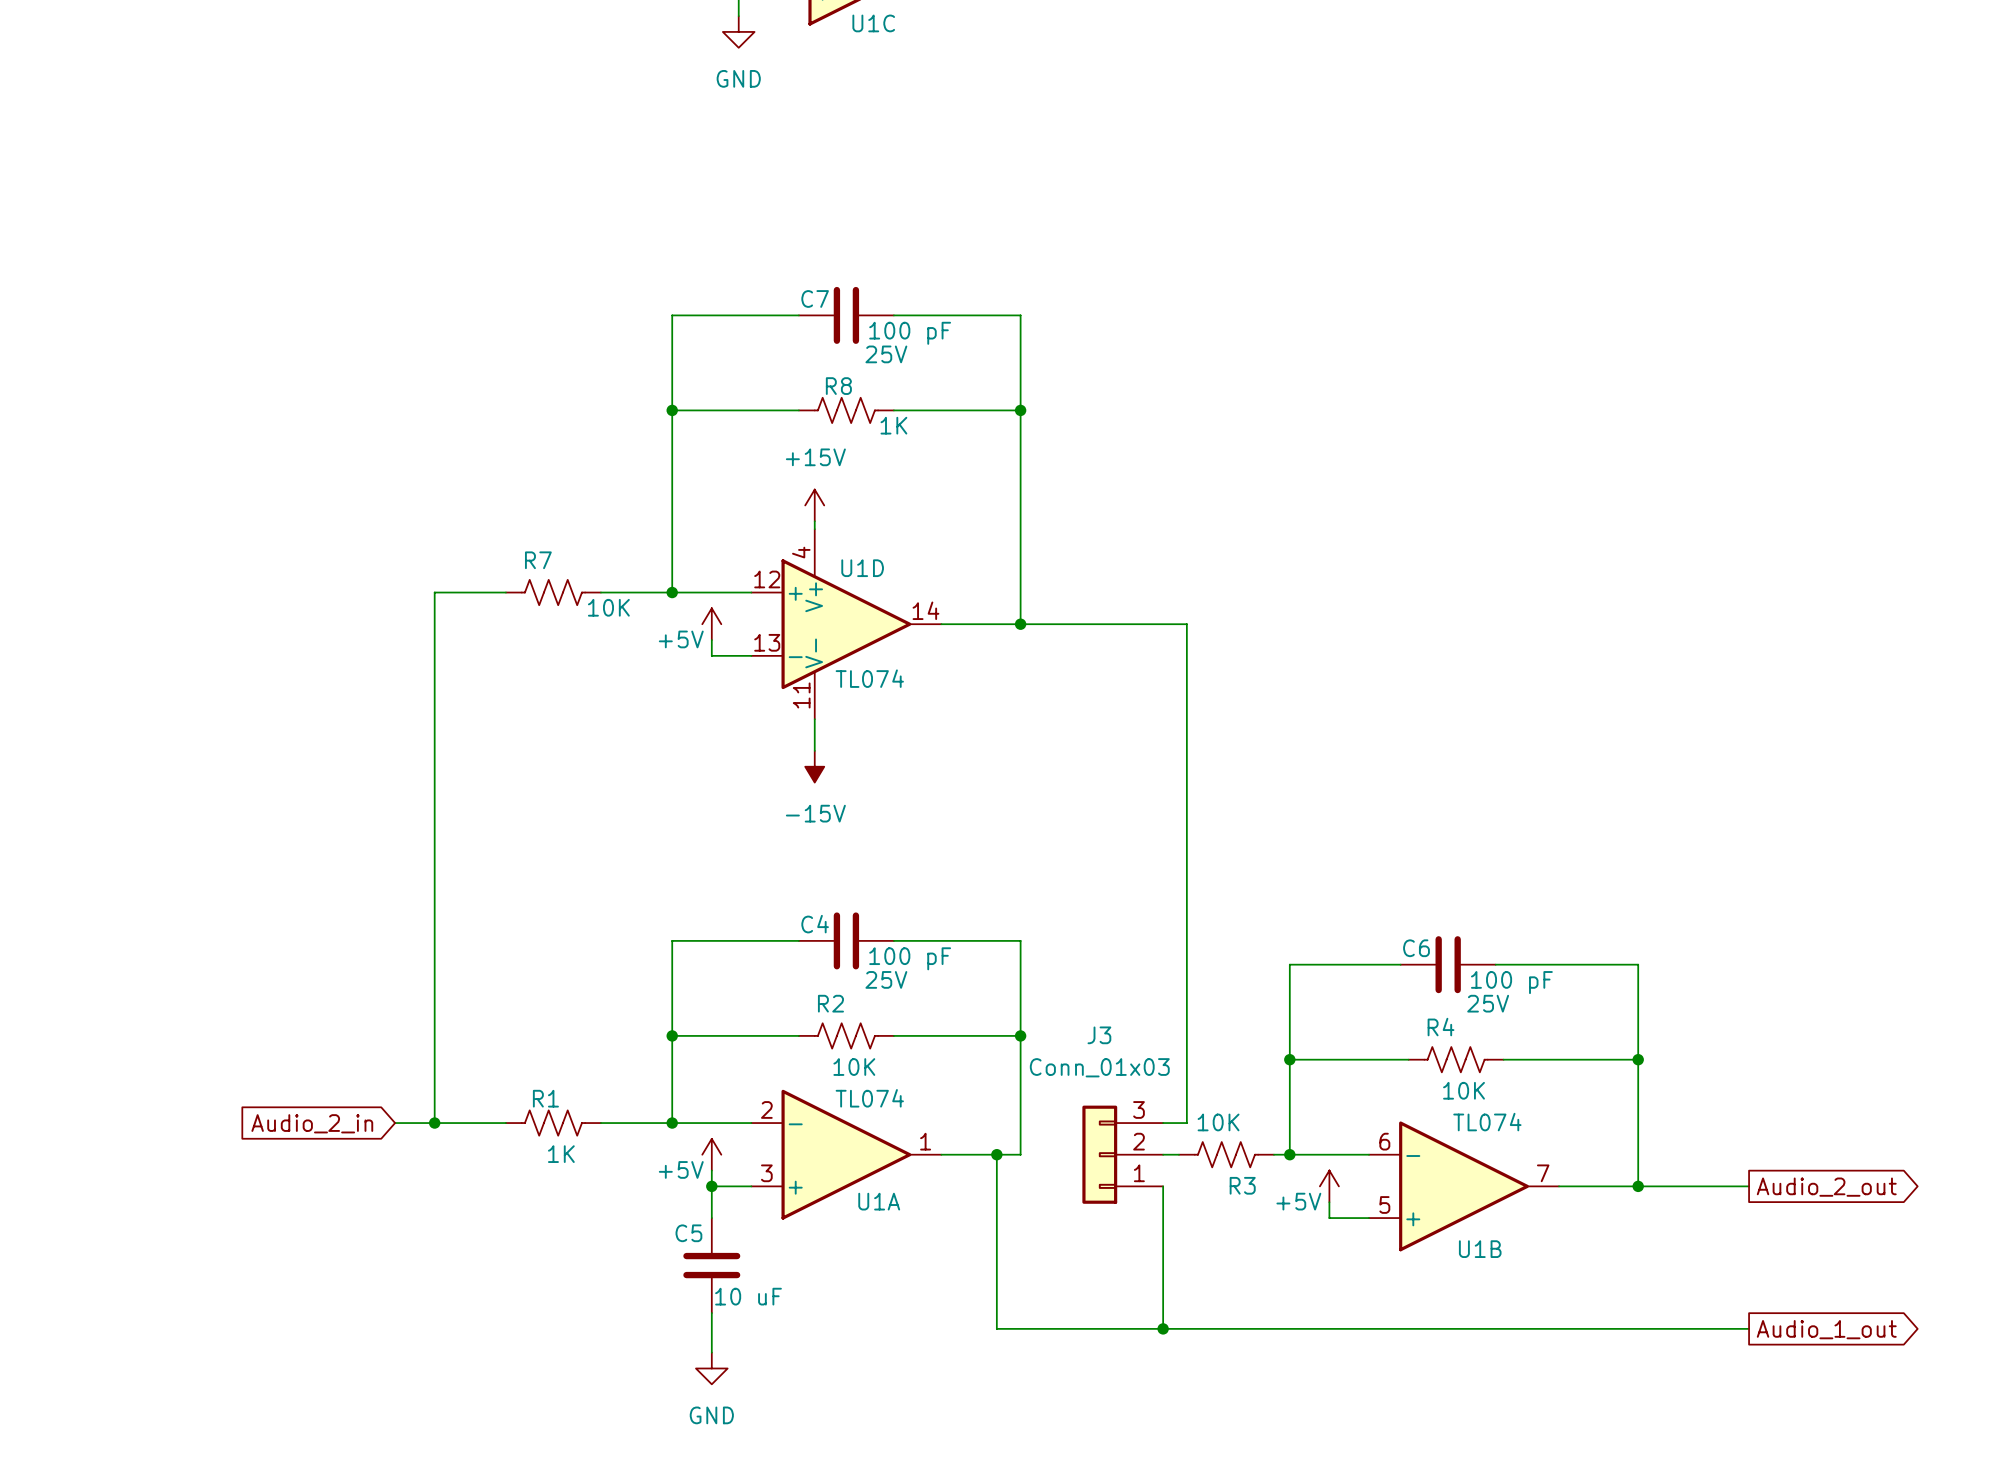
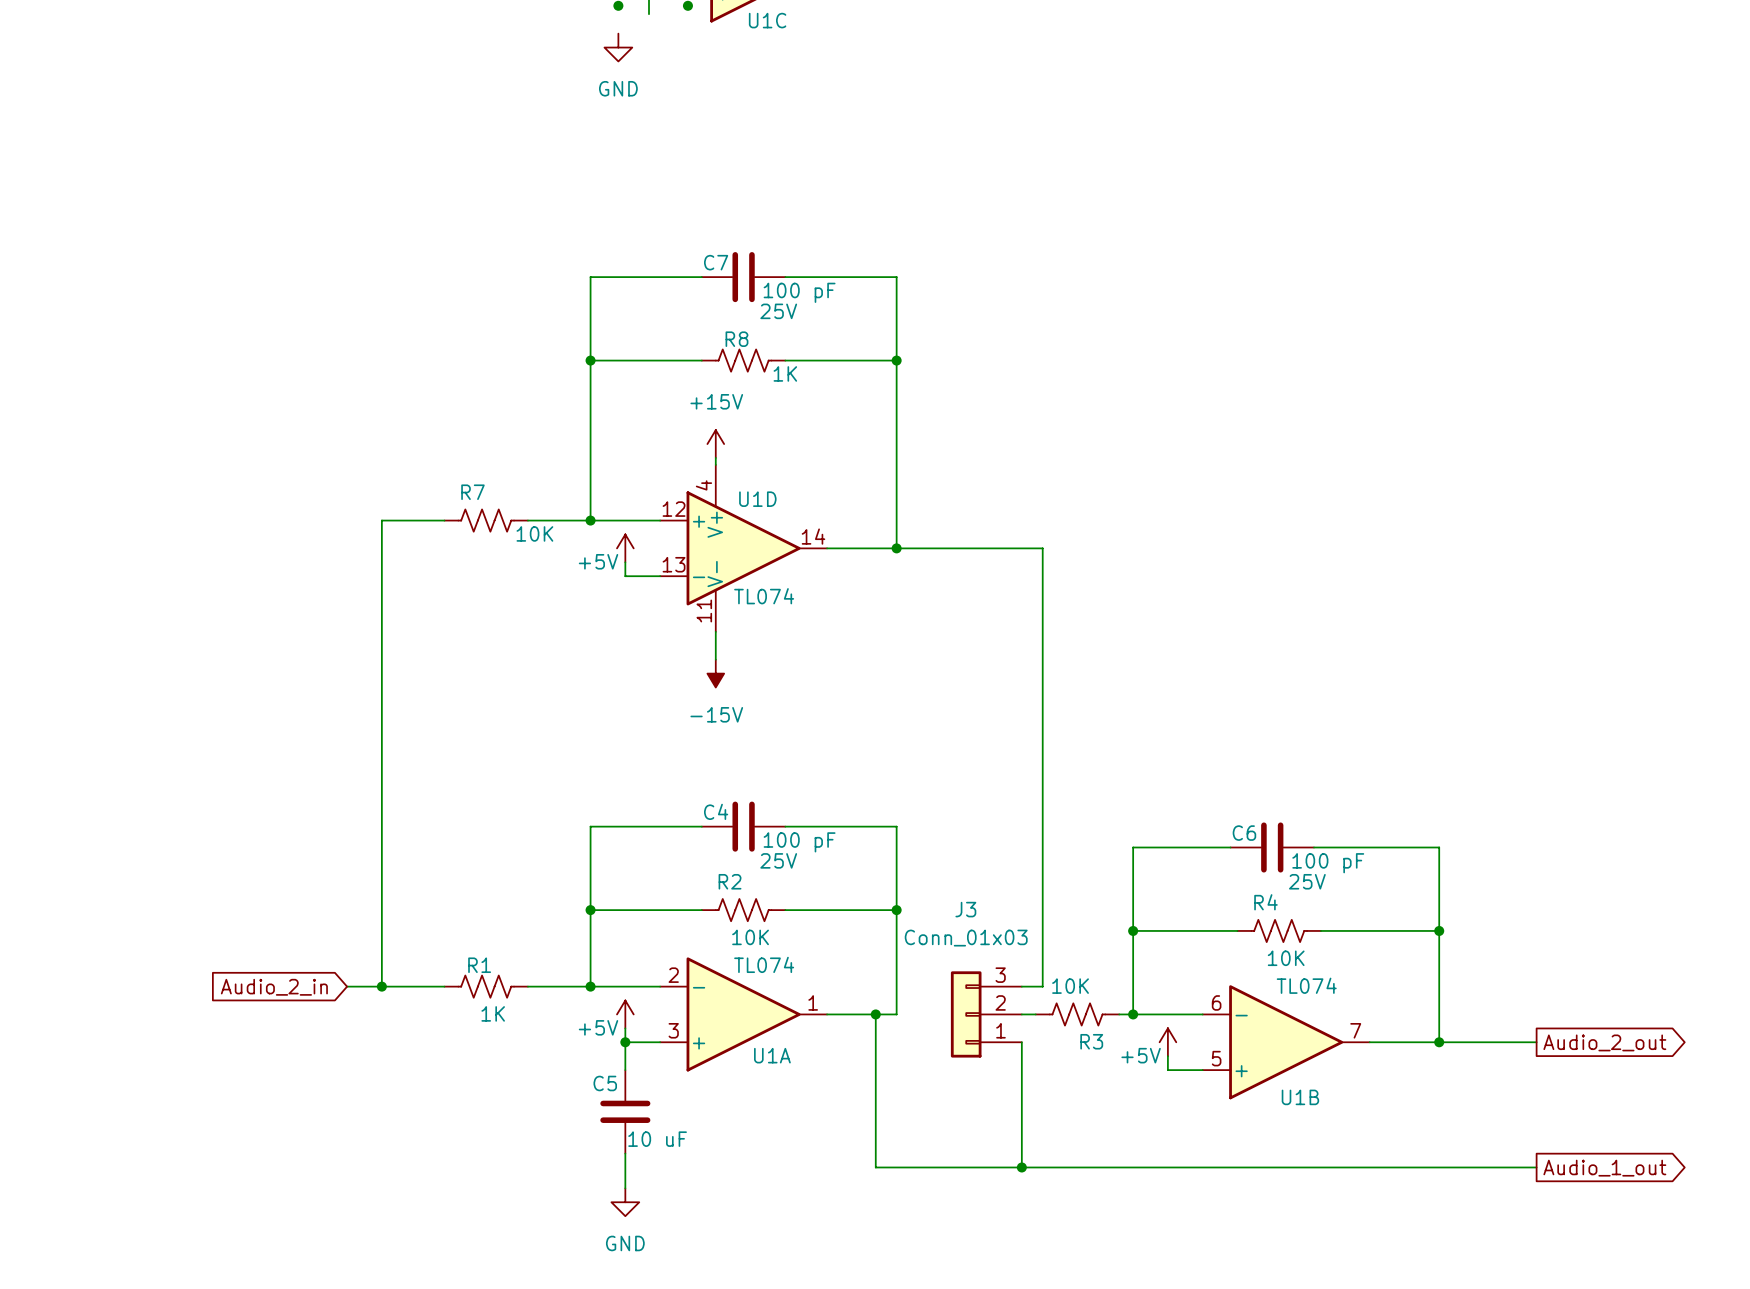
junction: none -> (618, 5)
junction: none -> (687, 5)
power symbol position: GND (738, 31) -> GND (618, 47)

